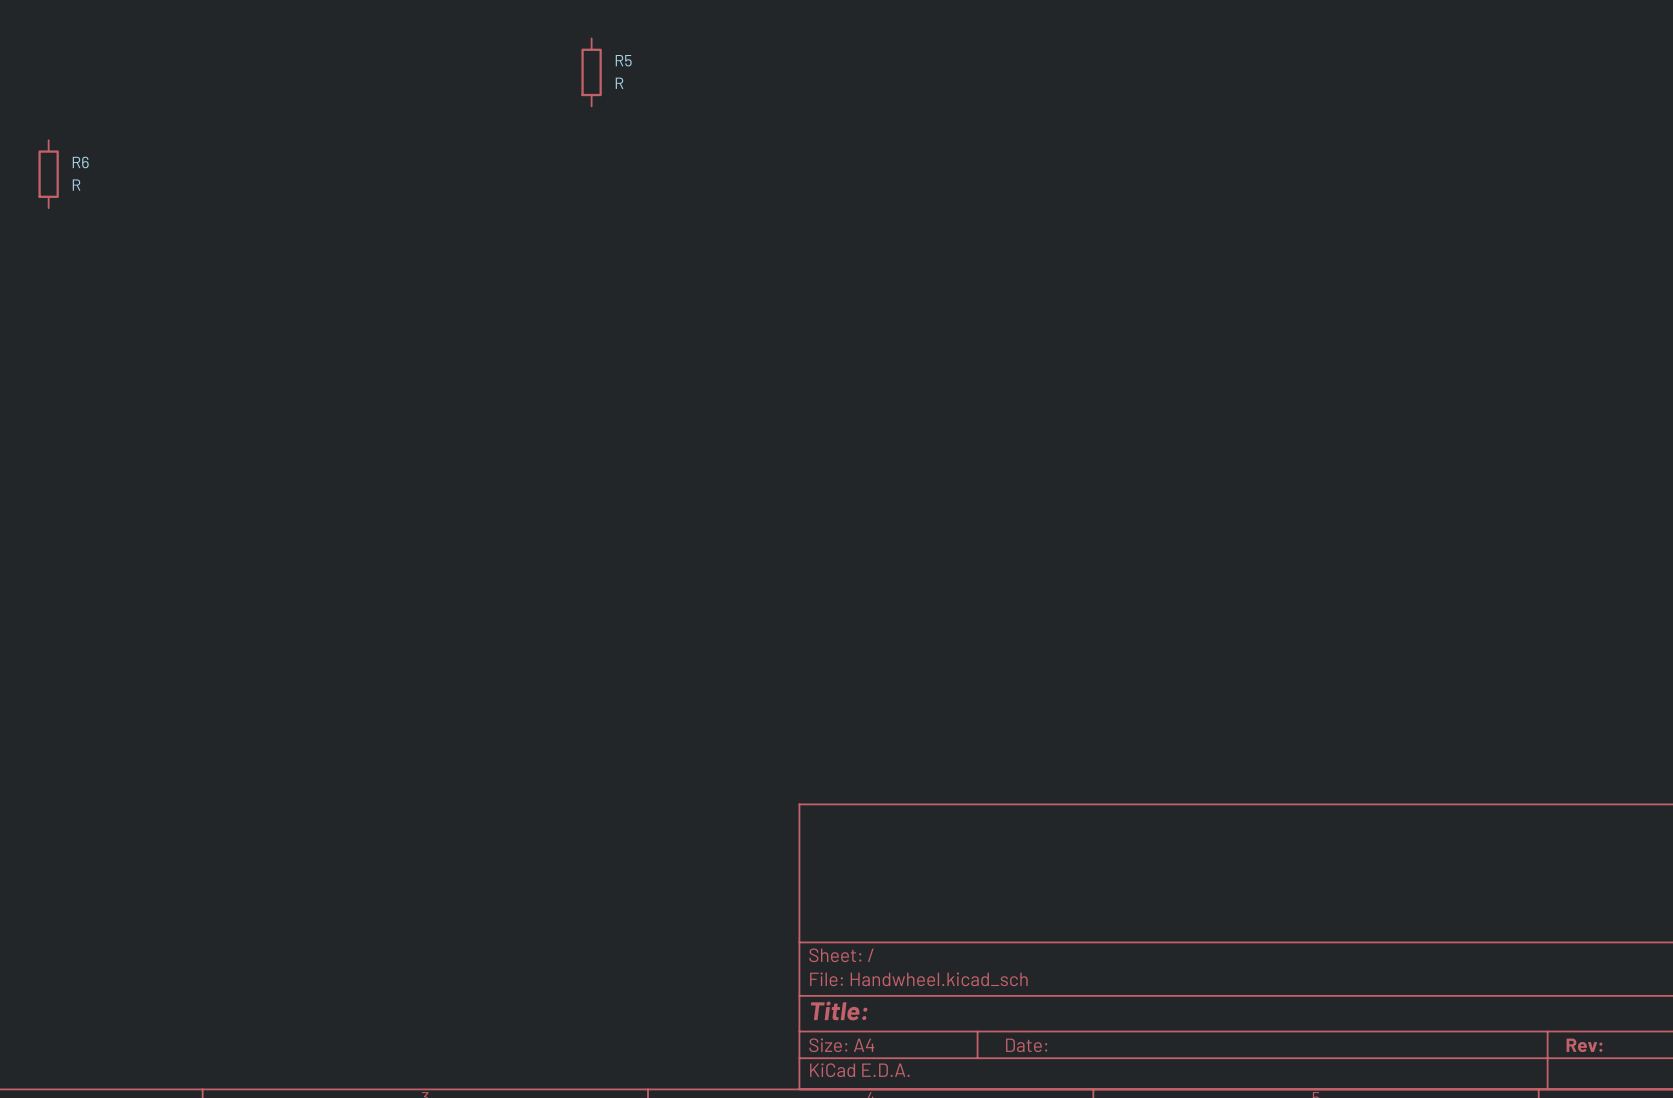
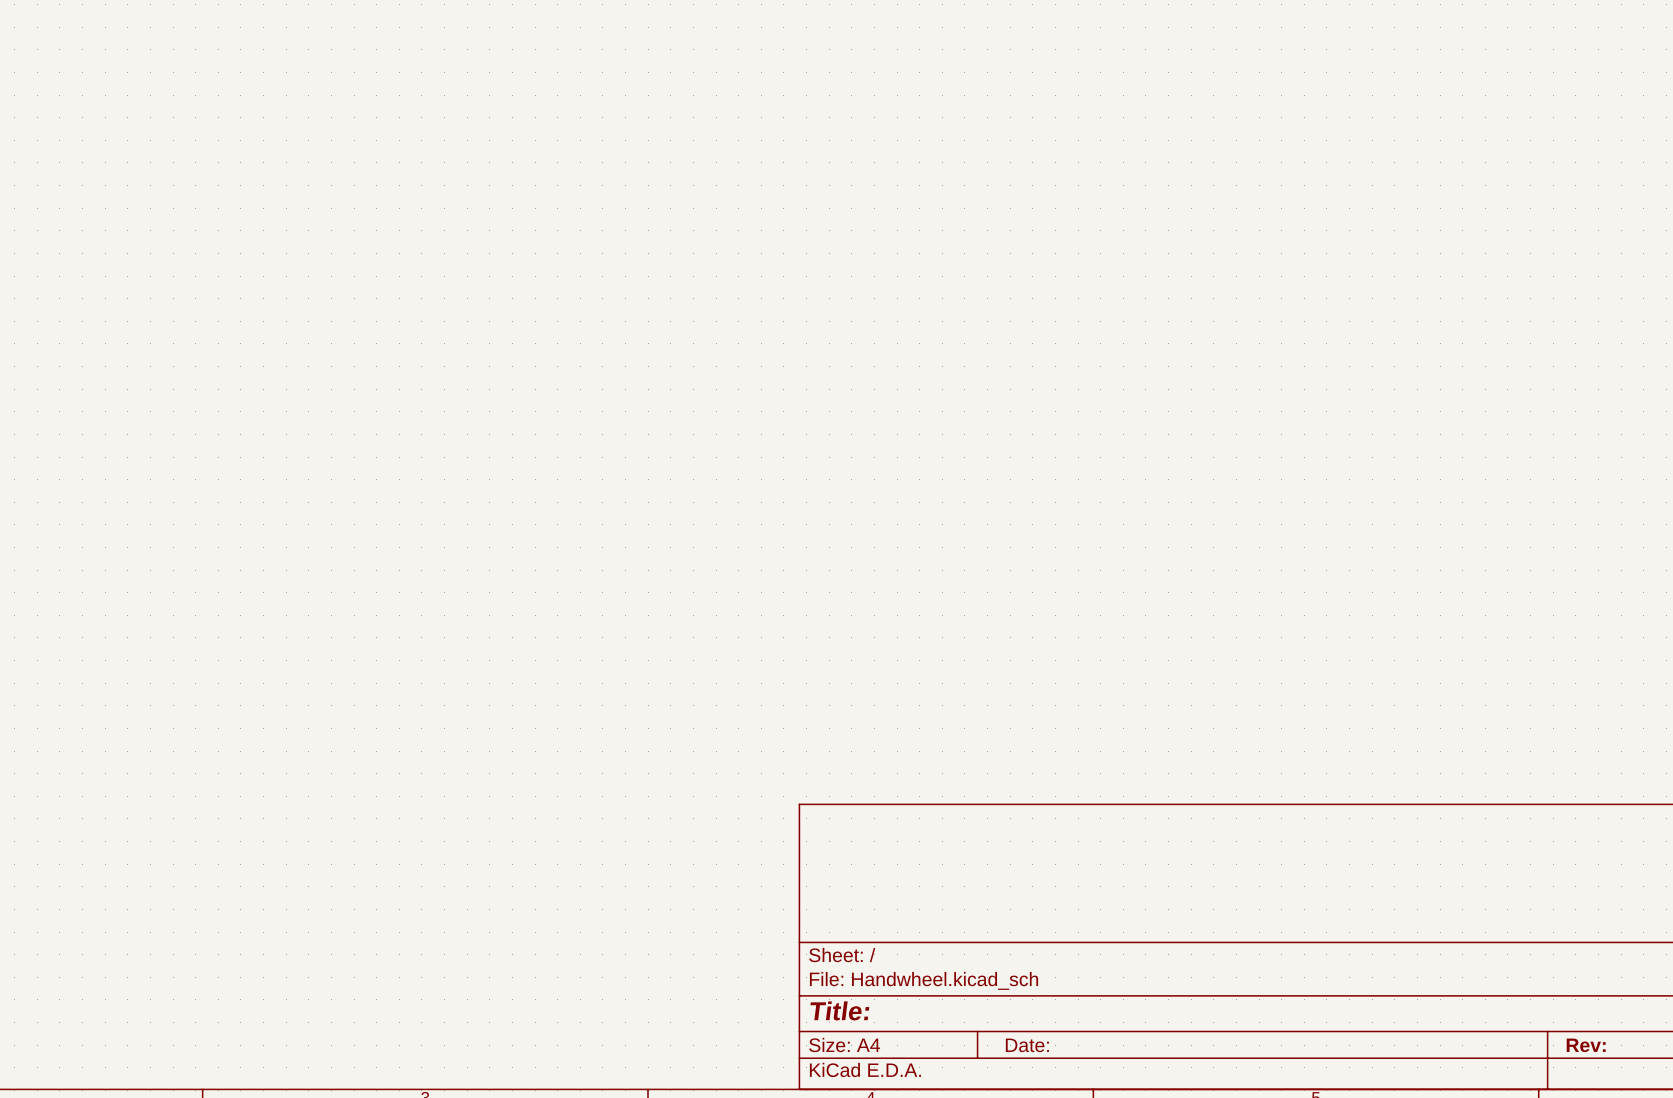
R5: R (591, 72) -> none
R6: R (48, 174) -> none

